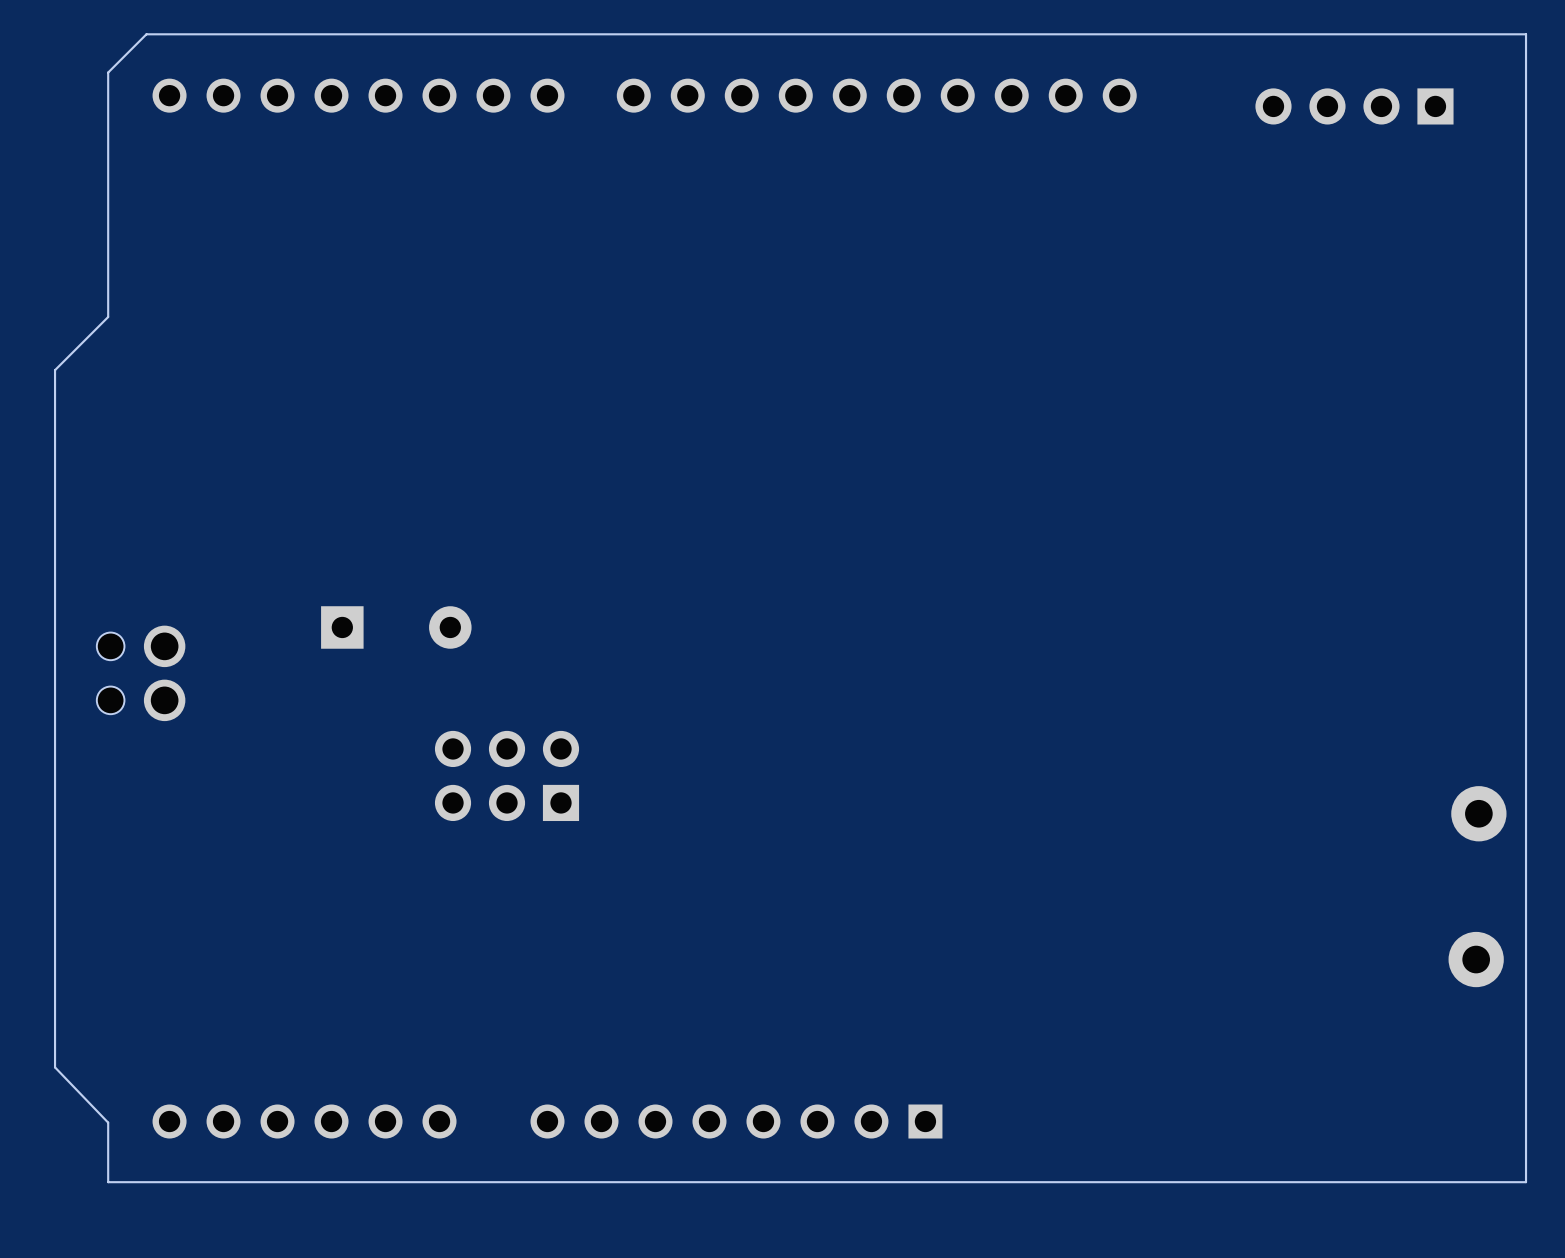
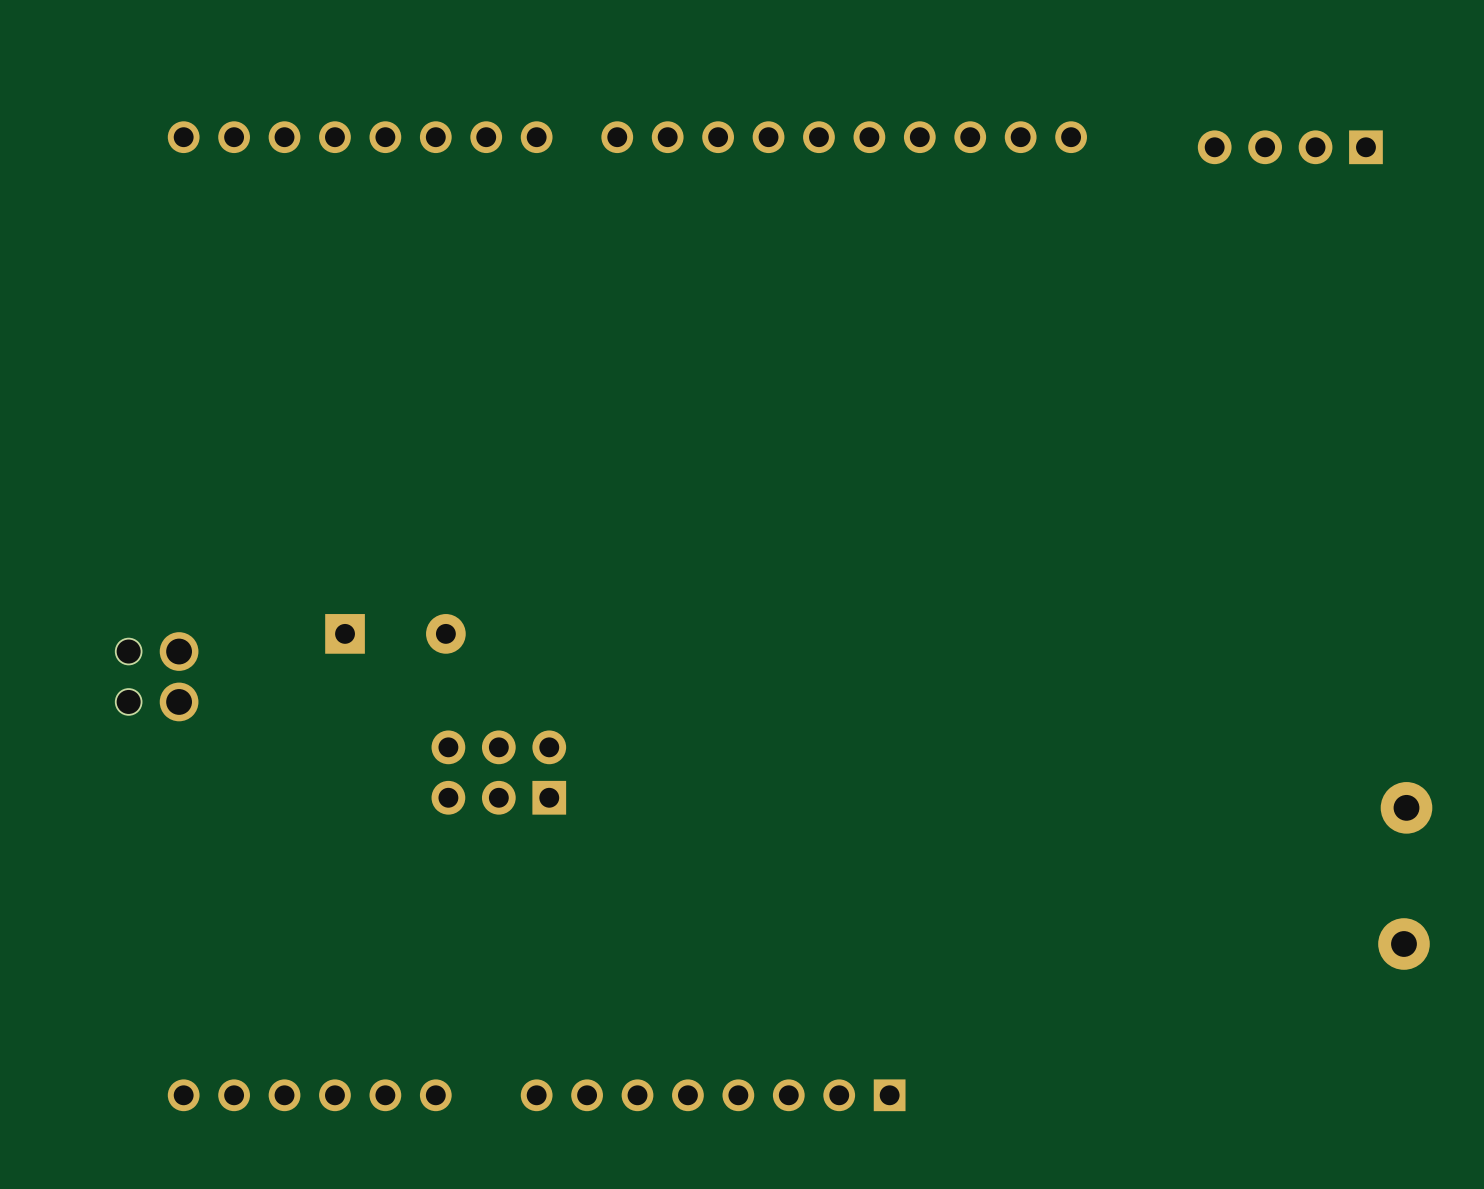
board edge: (1526, 34) (146, 34) (108, 72) (108, 317) (55, 370) (55, 1067) (108, 1122) (108, 1182) (1526, 1182) (1526, 34) -> none

